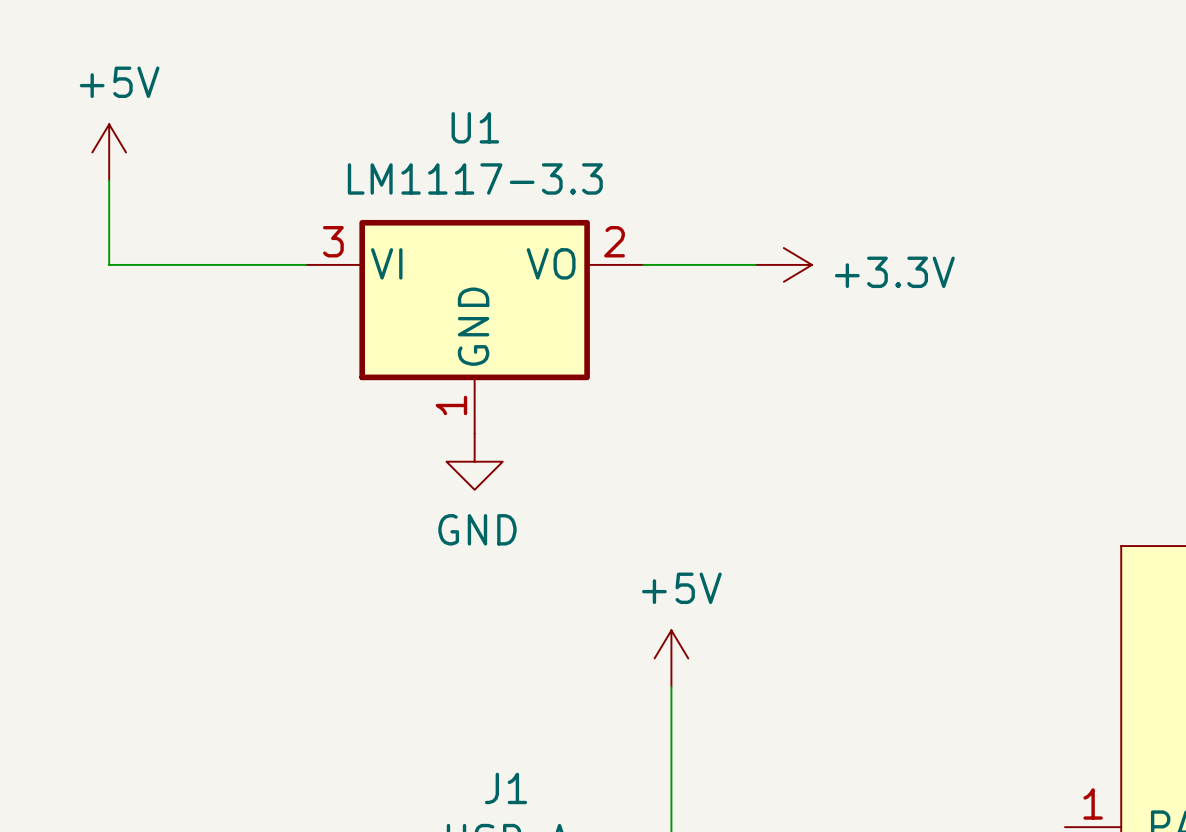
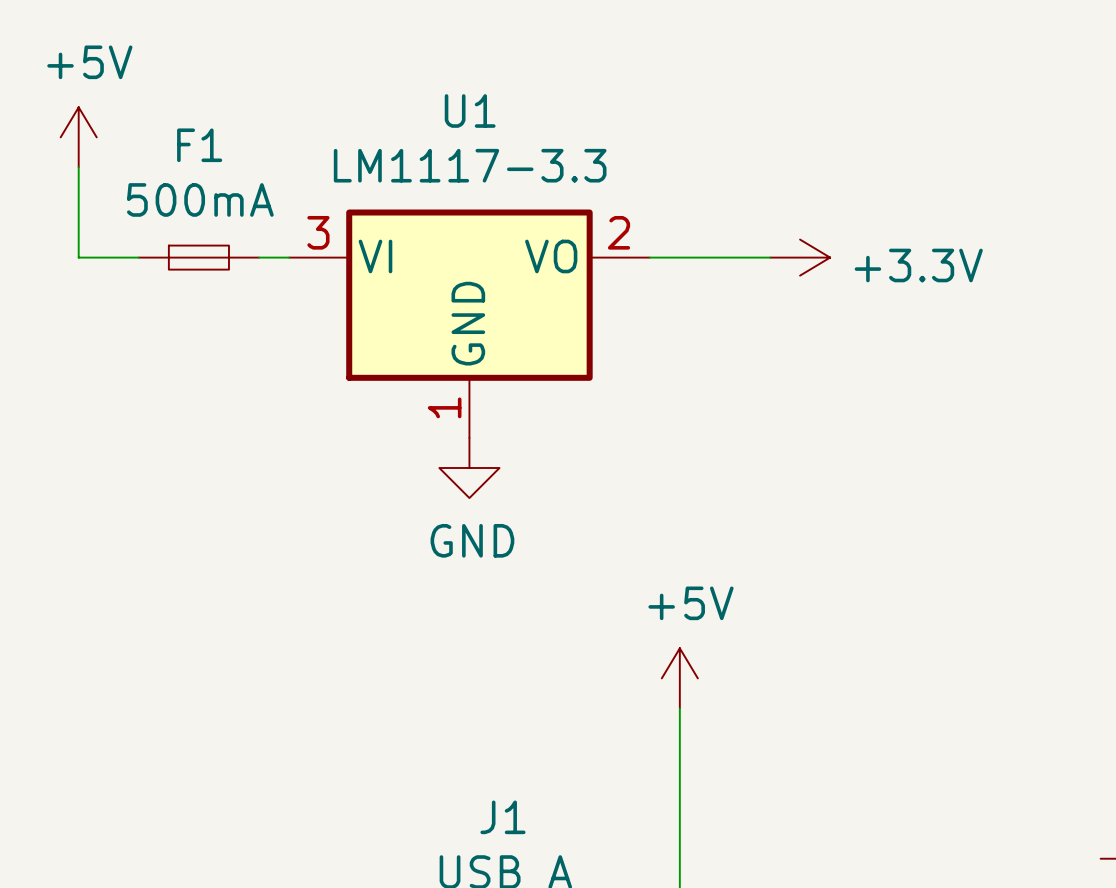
F1: none -> 500mA (198, 257)

